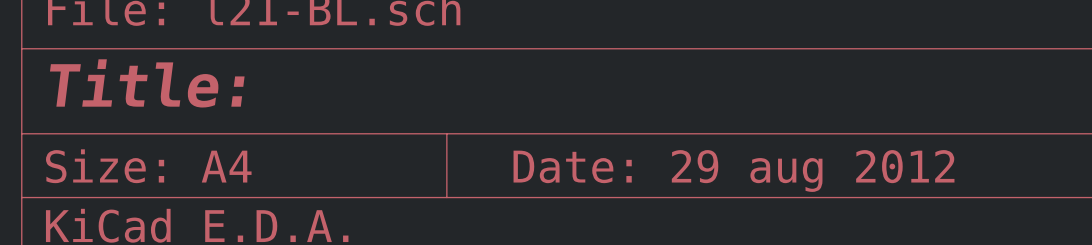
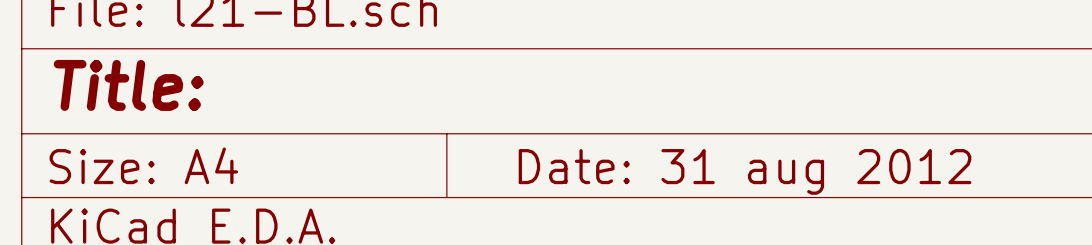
title block: Date: 29 aug 2012 (734, 171) -> Date: 31 aug 2012 (745, 171)

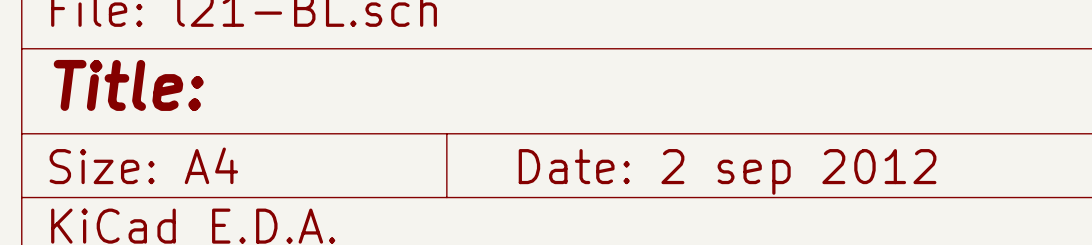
title block: Date: 31 aug 2012 (745, 171) -> Date: 2 sep 2012 (727, 171)

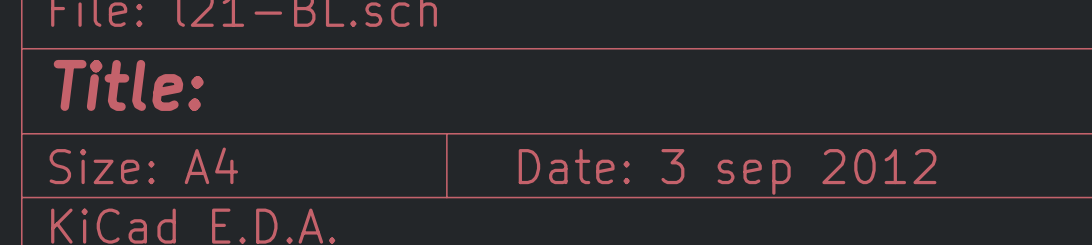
title block: Date: 2 sep 2012 (727, 171) -> Date: 3 sep 2012 (727, 171)

